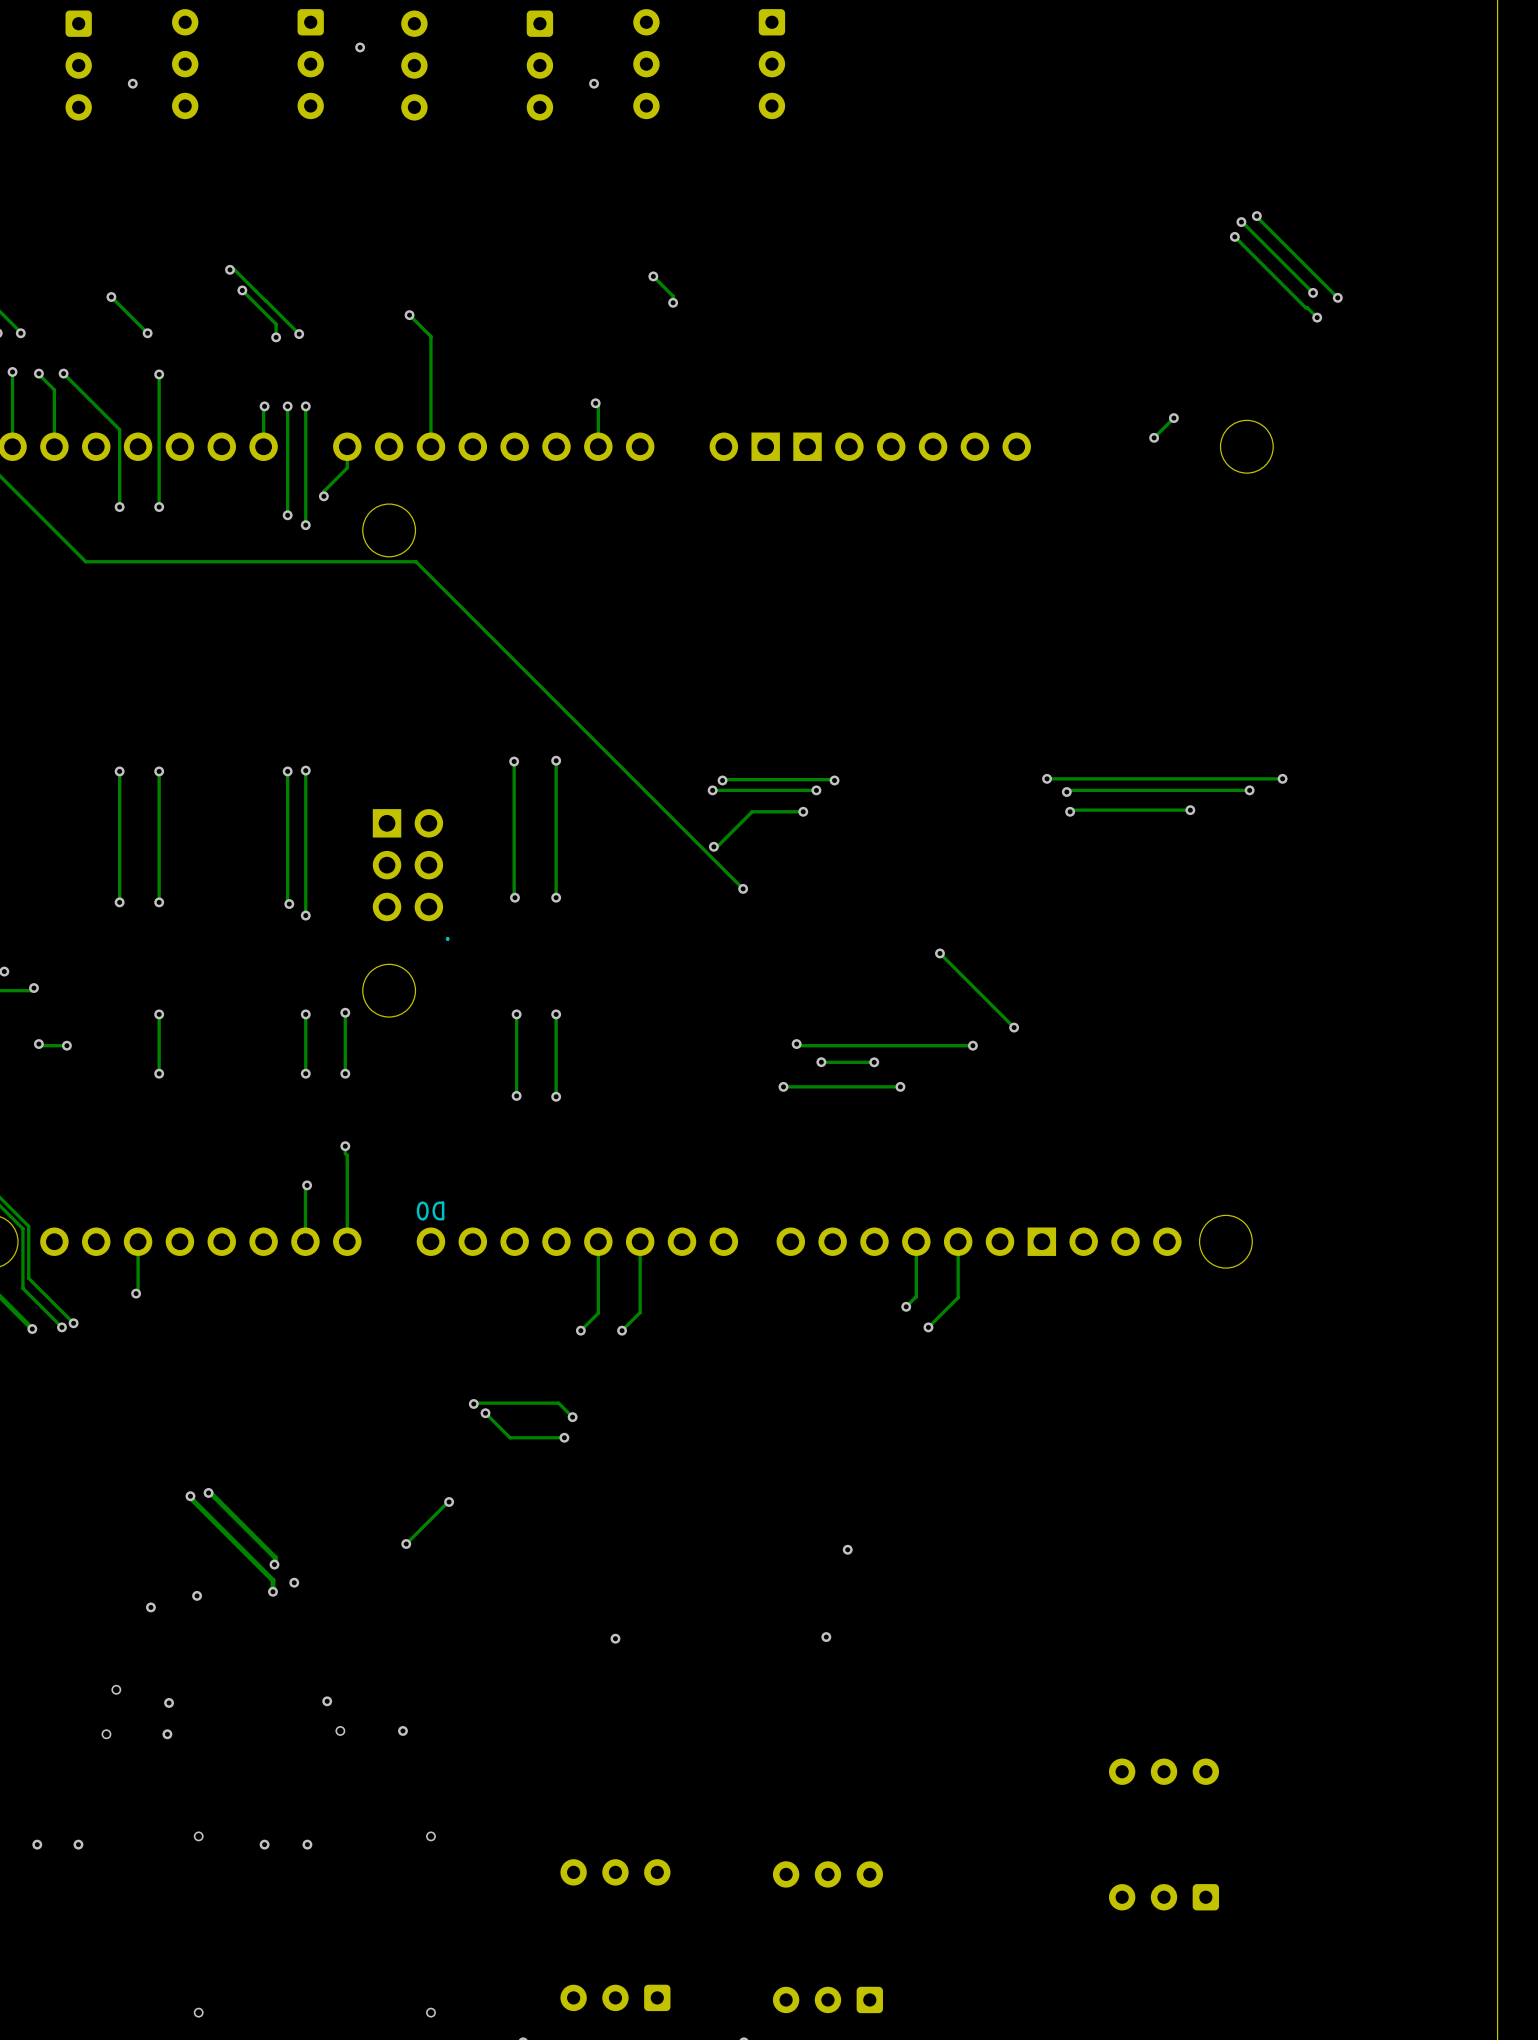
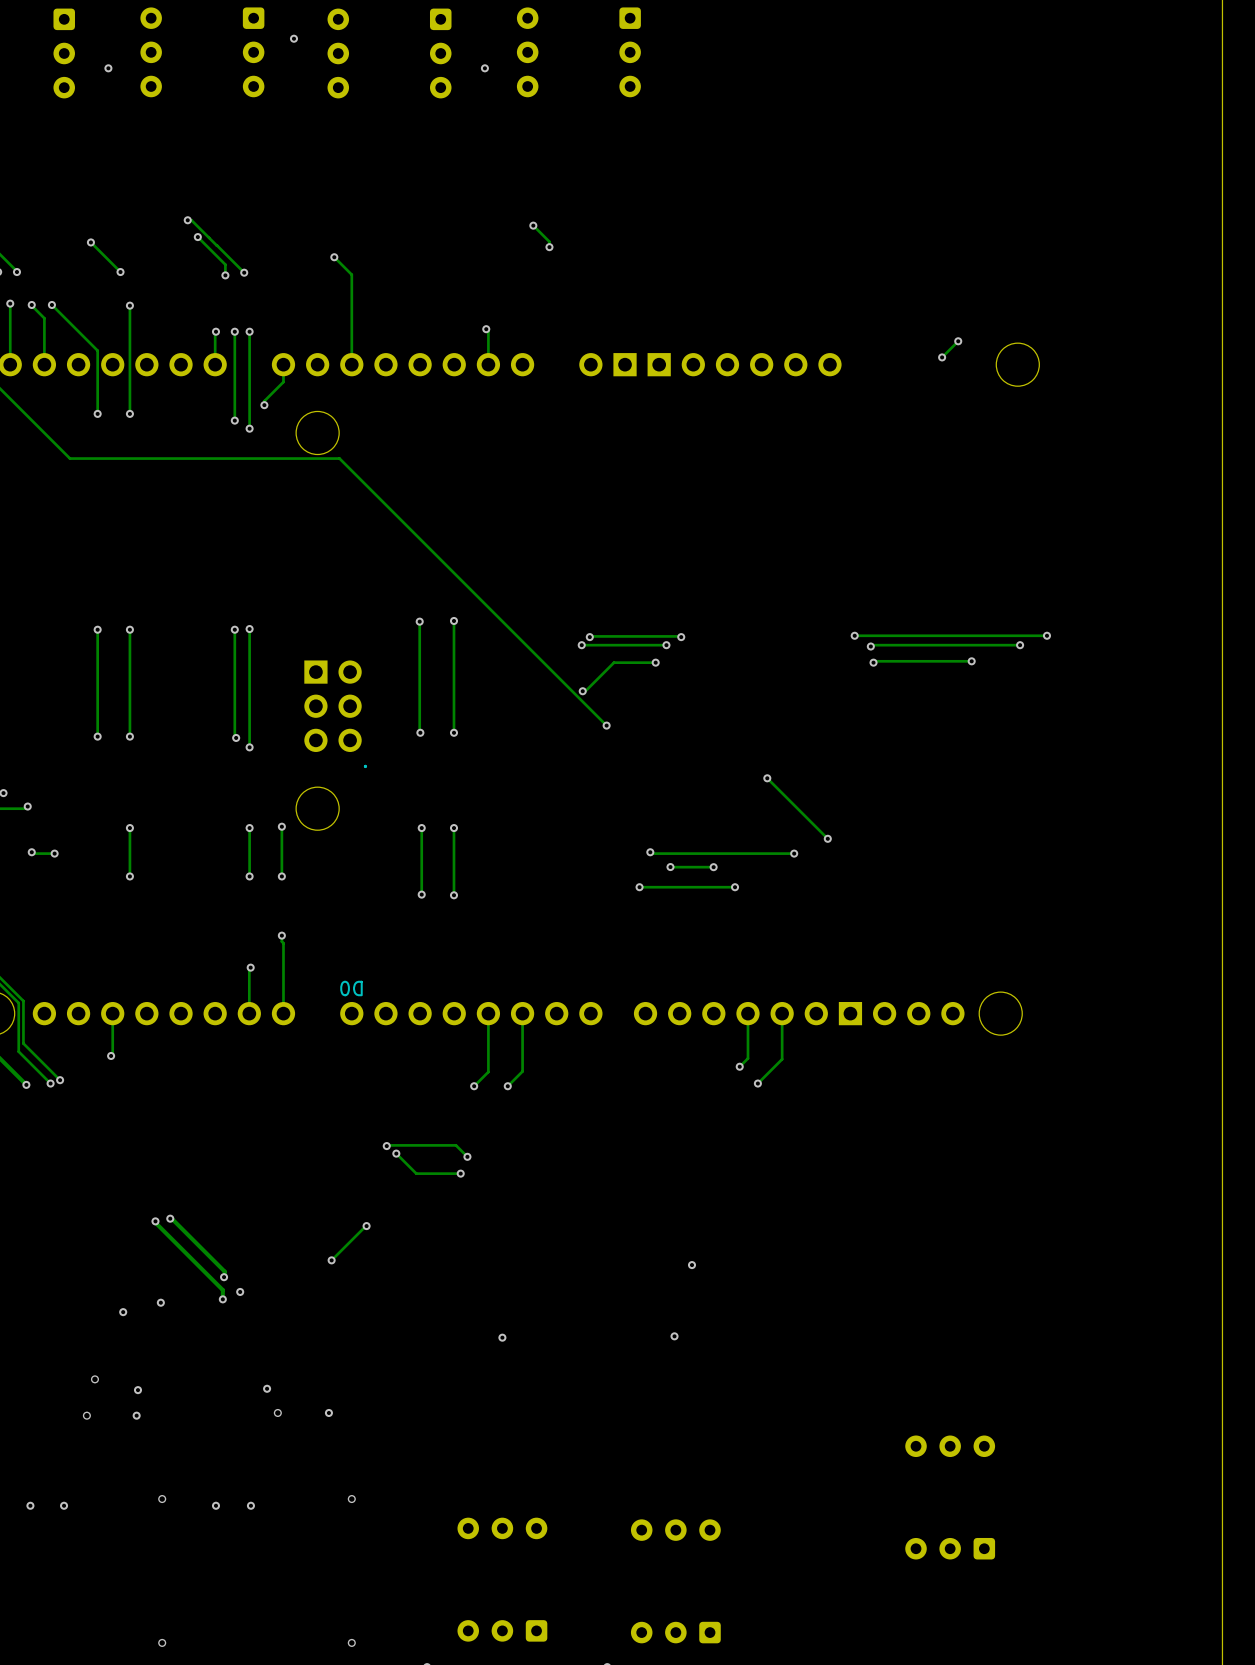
track: (1256, 216) (1337, 297) -> none
via: (1256, 216) -> none
track: (1241, 222) (1313, 292) -> none
via: (1241, 222) -> none
track: (1234, 236) (1317, 317) -> none
via: (1234, 236) -> none
via: (1313, 292) -> none
via: (1337, 297) -> none
via: (1317, 317) -> none

